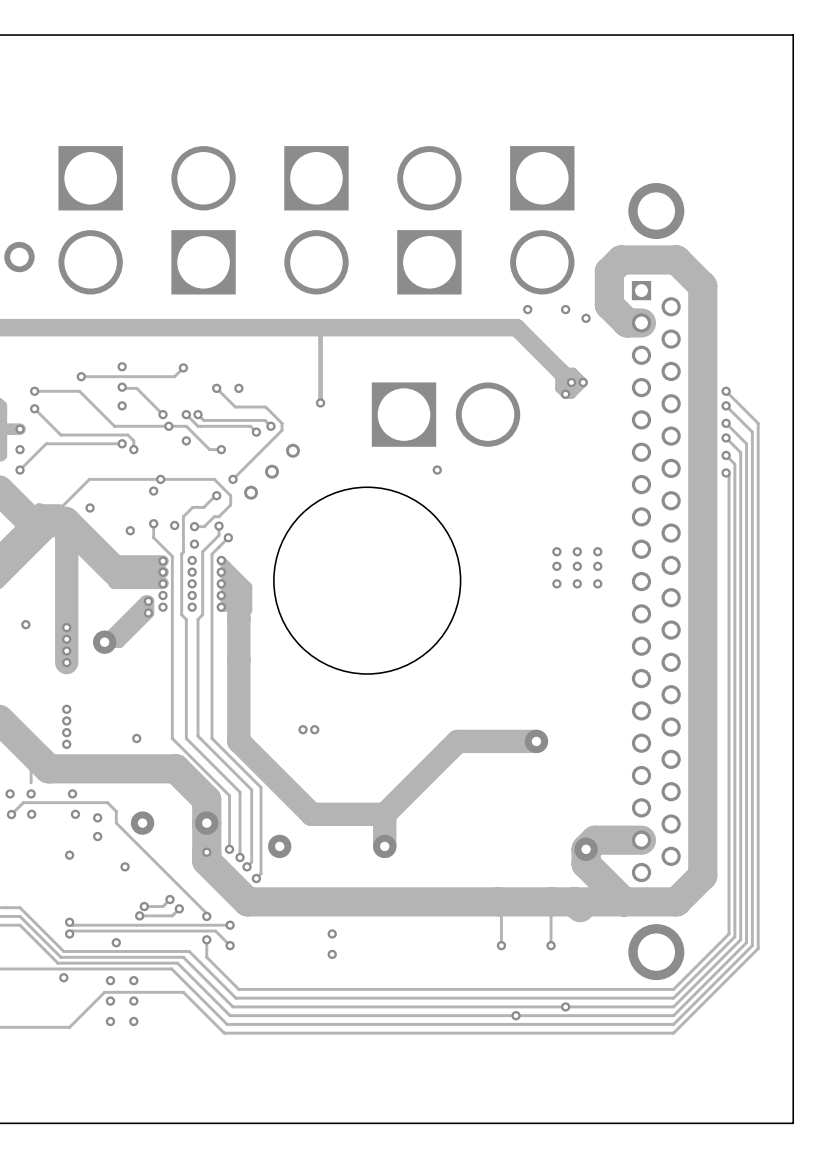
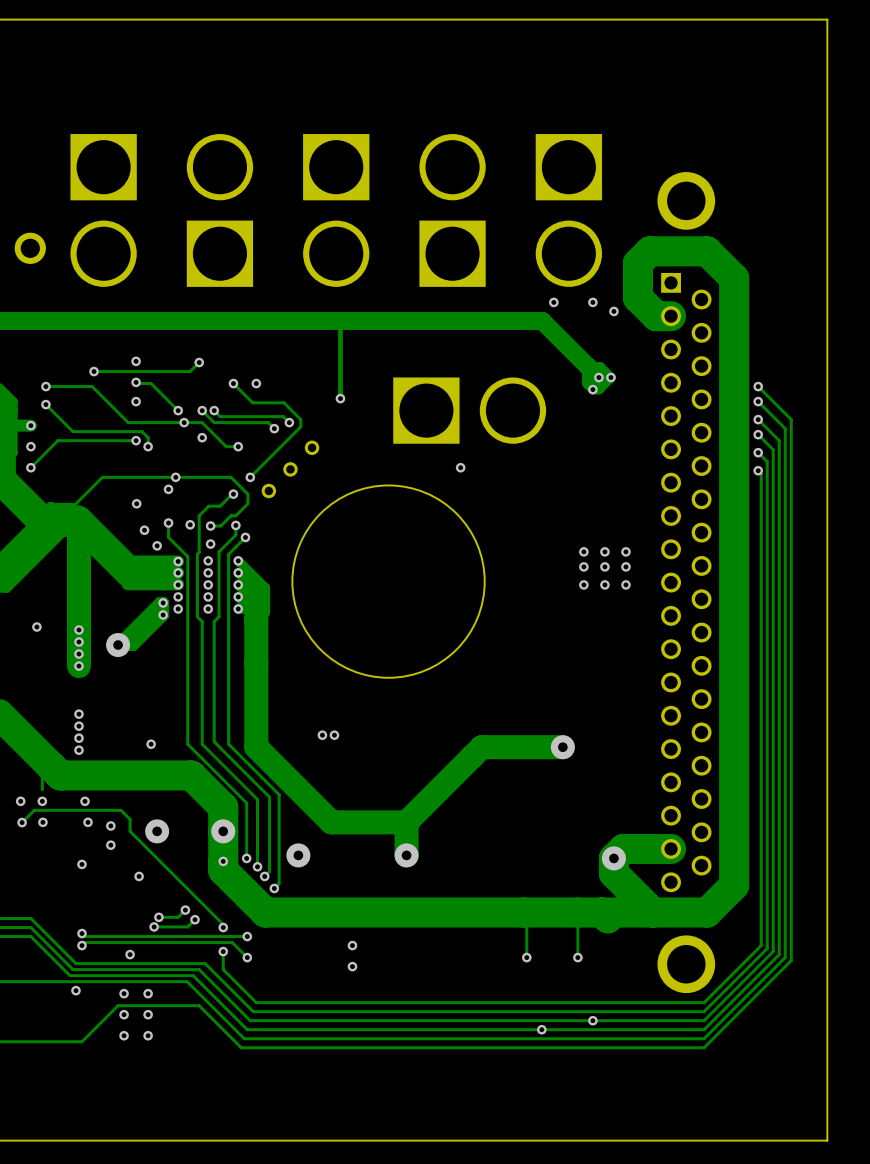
via: none -> (136, 503)
via: (90, 507) -> none
via: none -> (157, 545)

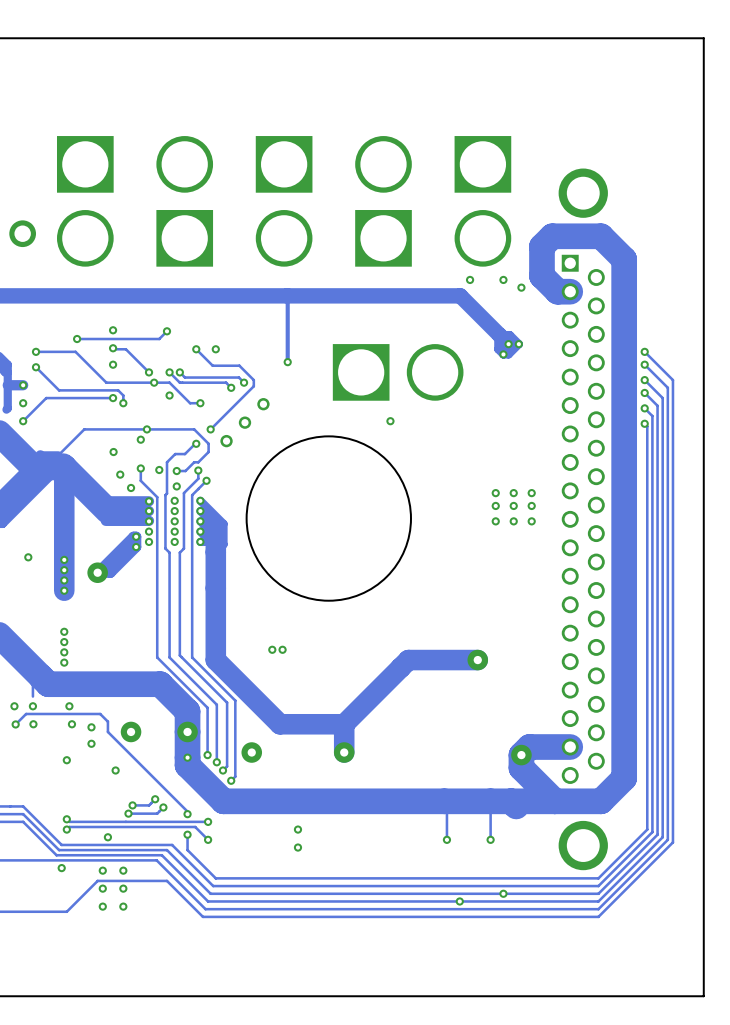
via: (151, 744) -> none

